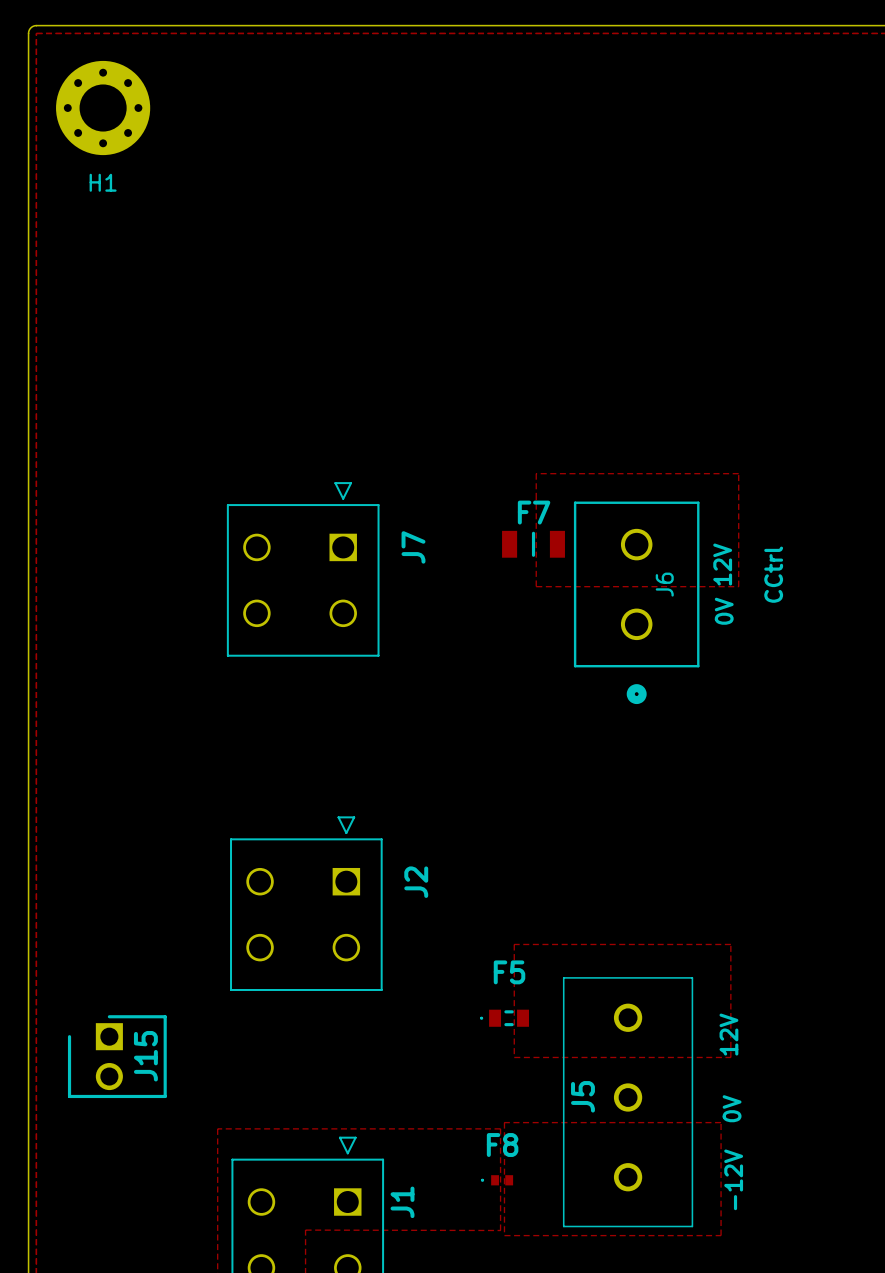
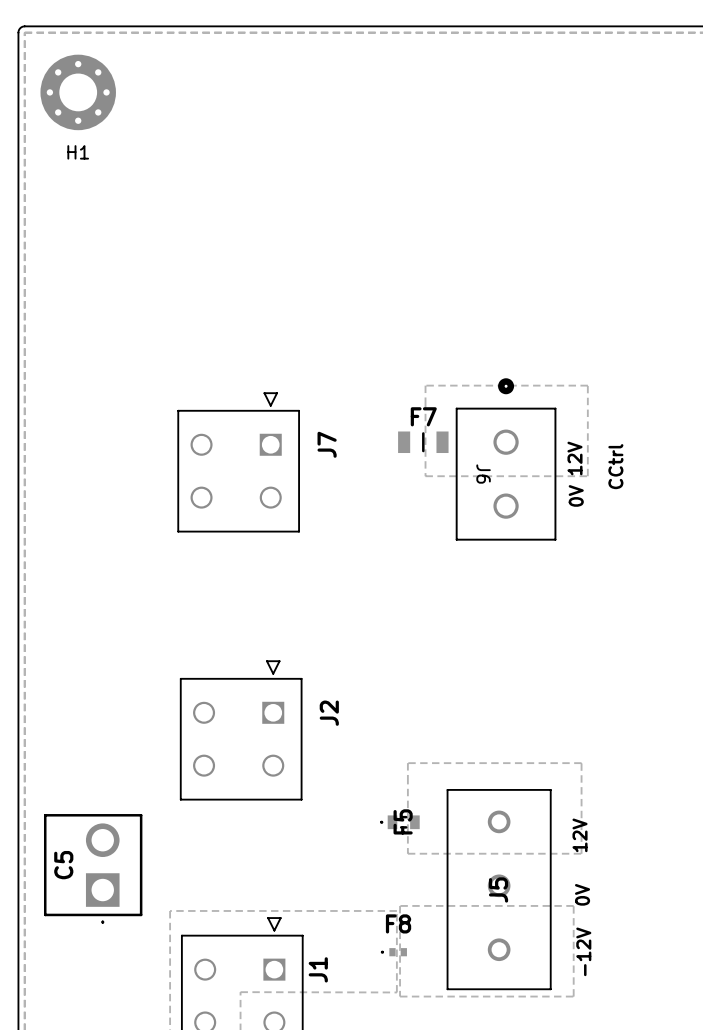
J6 rotation: 0° (636, 602) -> 180° (506, 459)
F5 name rotation: 0° (509, 972) -> 90° counterclockwise (403, 821)
J15: (117, 1056) -> none
C5: none -> (93, 868)
J5 name position: J5 (582, 1096) -> J5 (498, 889)

